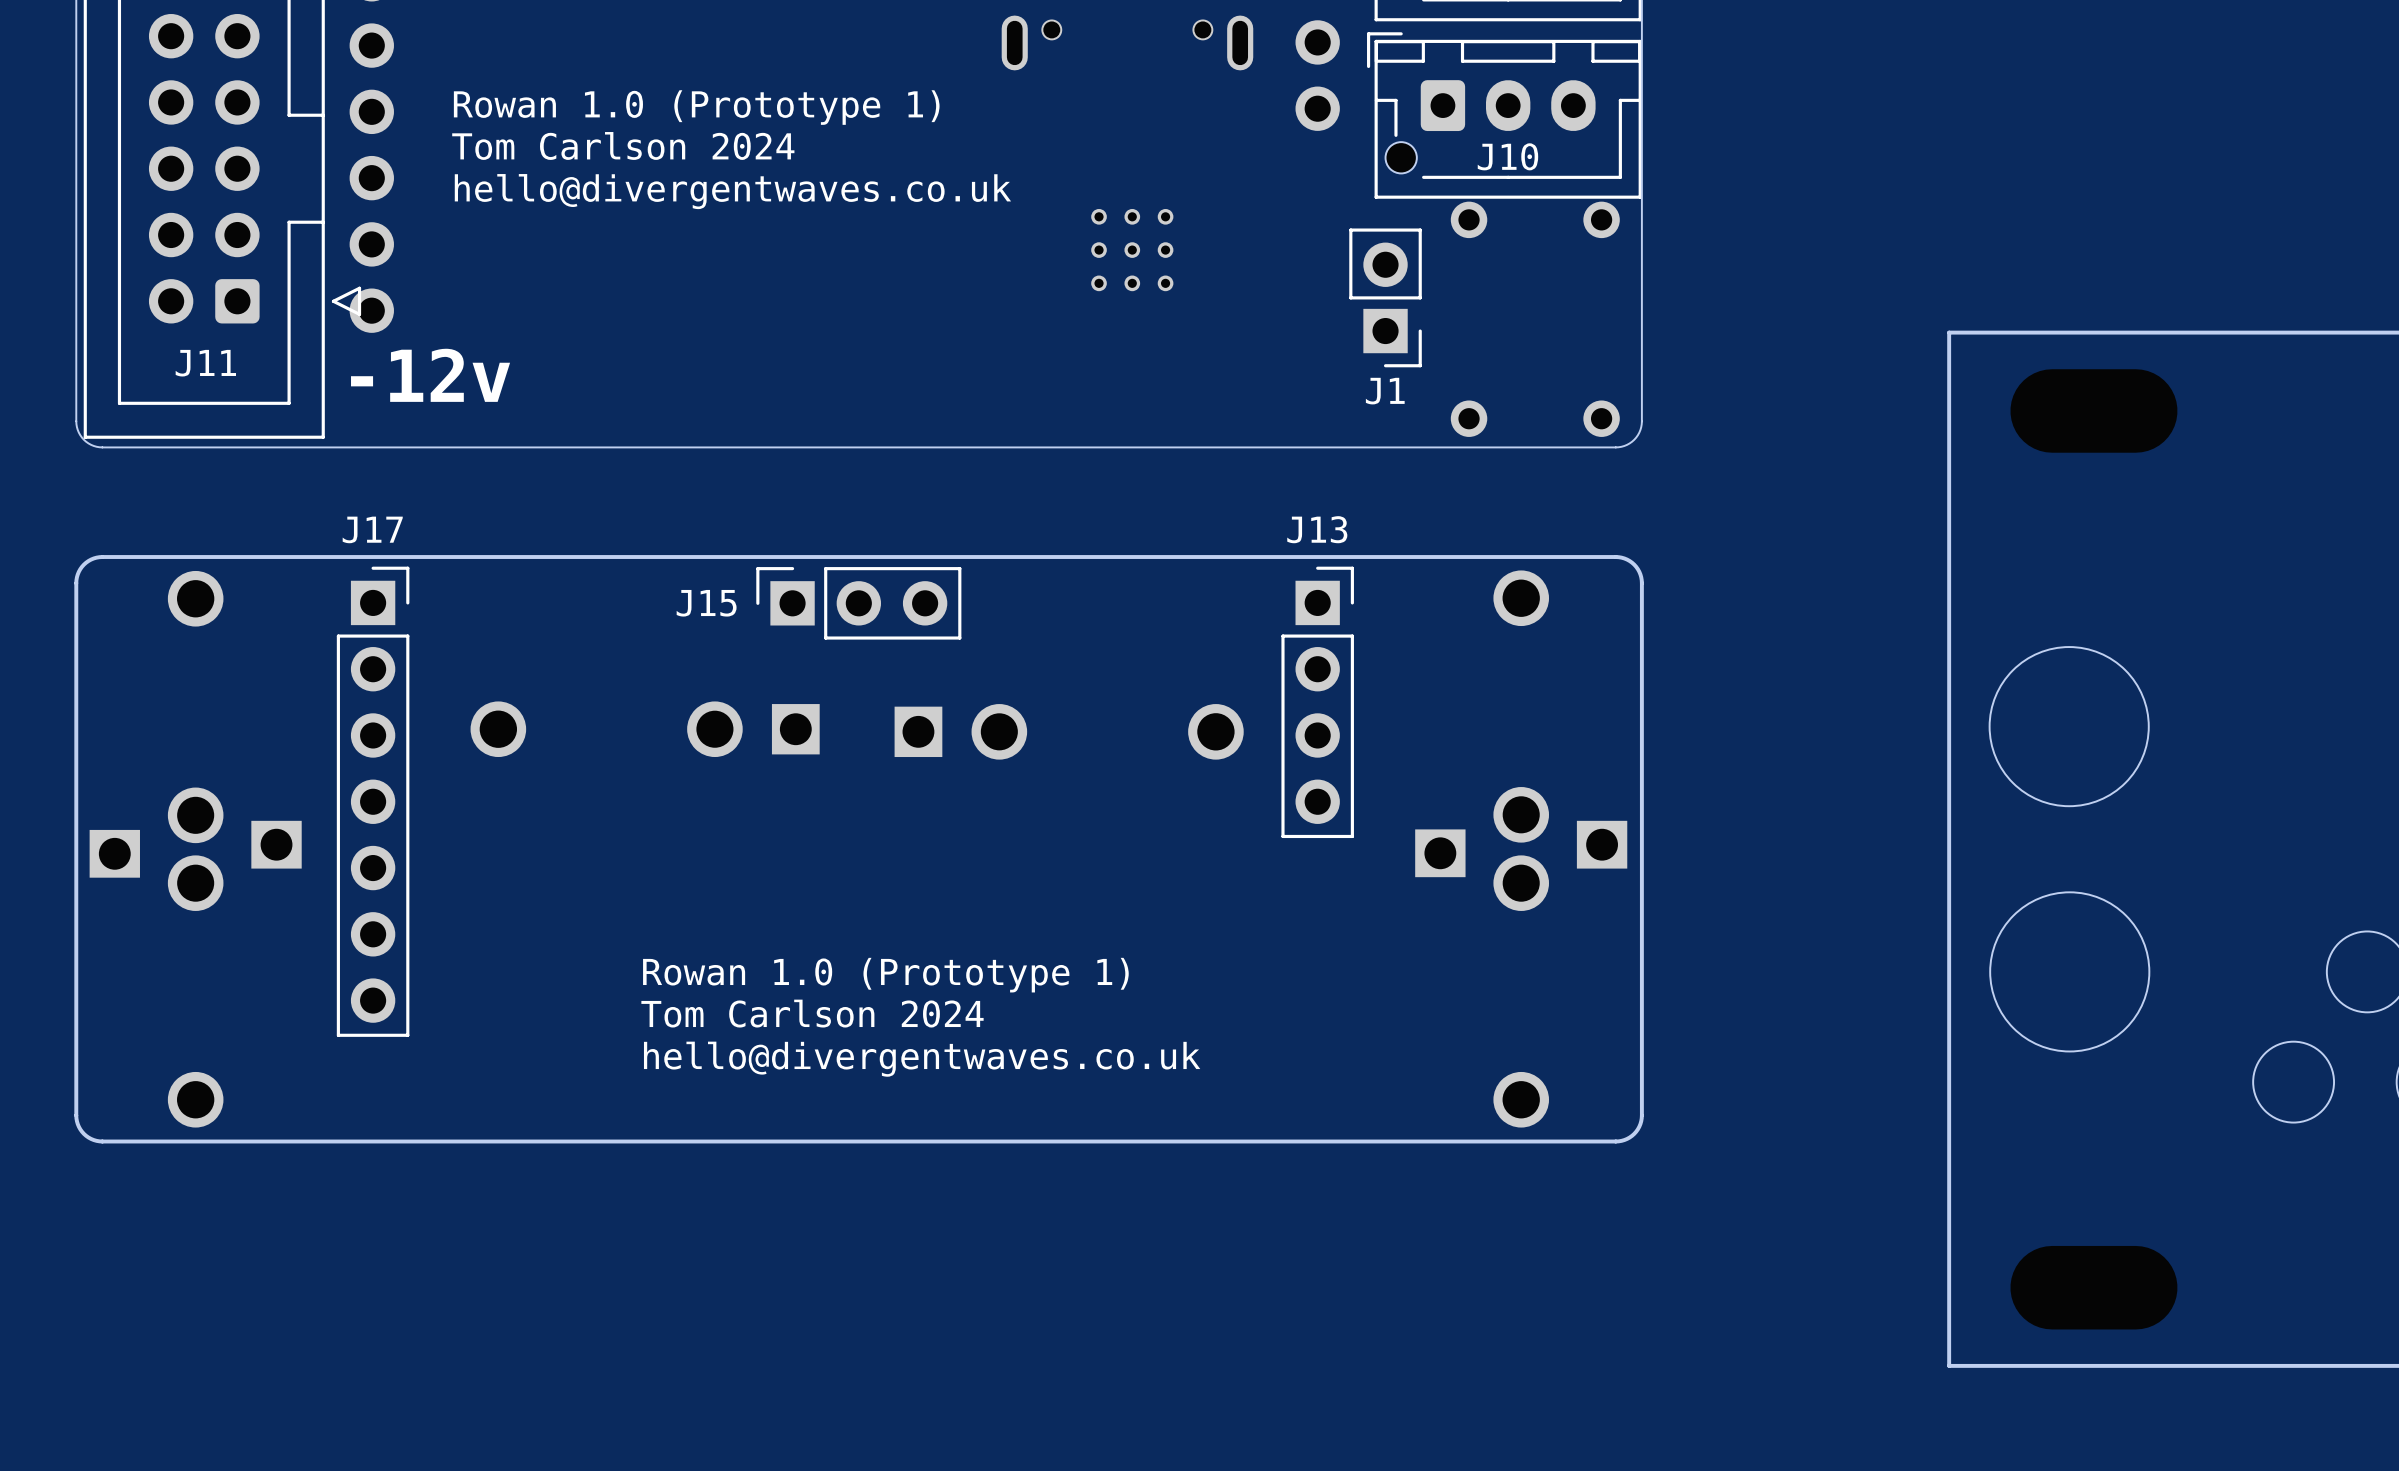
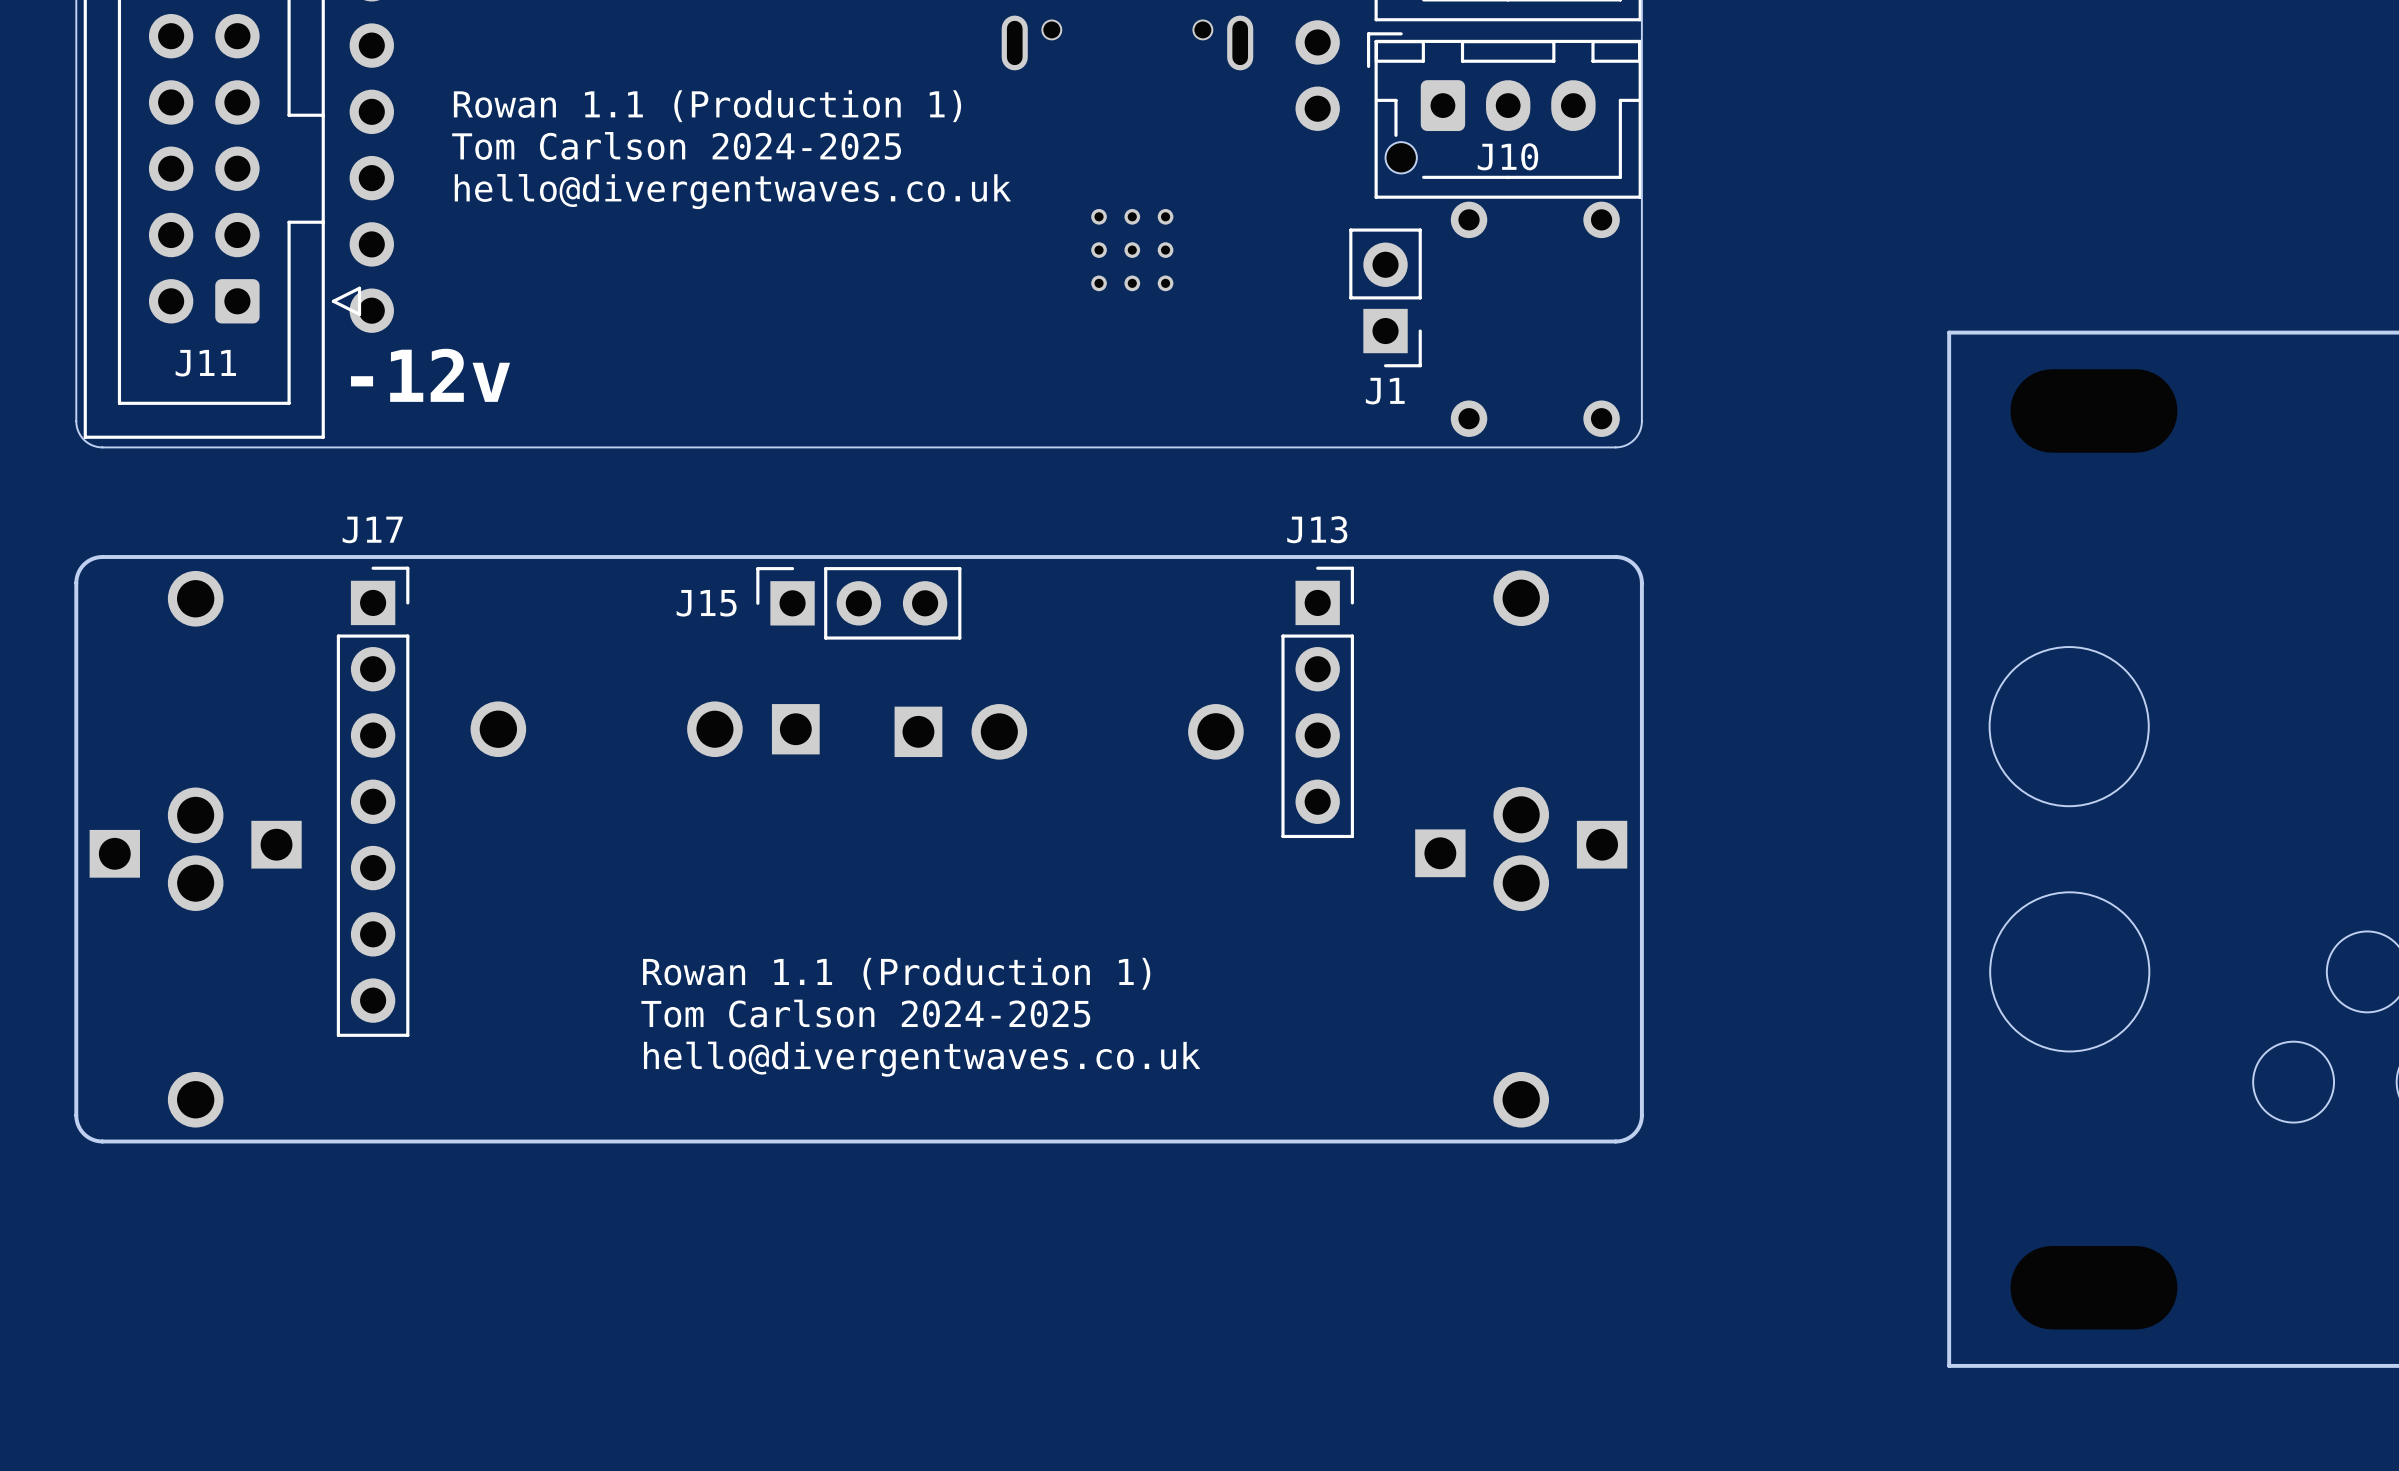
text: Rowan 1.0 (Prototype 1) (696, 107) -> Rowan 1.1 (Production 1) (707, 106)
text: Tom Carlson 2024 (623, 145) -> Tom Carlson 2024-2025 (676, 145)
text: Rowan 1.0 (Prototype 1) (885, 975) -> Rowan 1.1 (Production 1) (896, 973)
text: Tom Carlson 2024 (812, 1013) -> Tom Carlson 2024-2025 (865, 1013)

